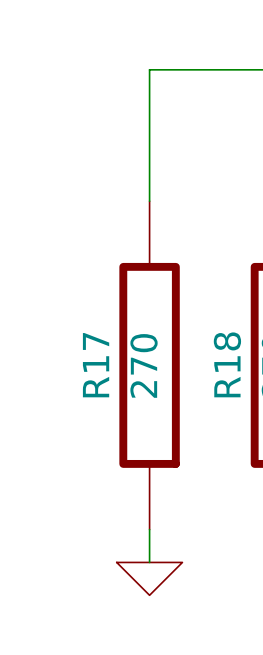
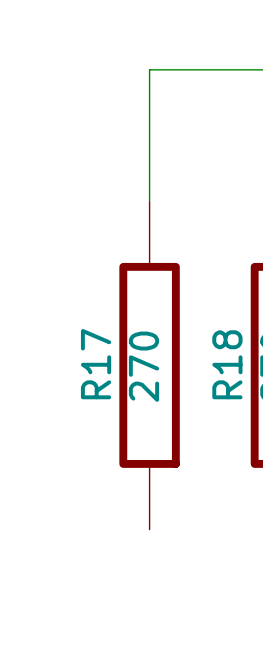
wire: (149, 529) (149, 562) -> none
power symbol: (149, 578) -> none

